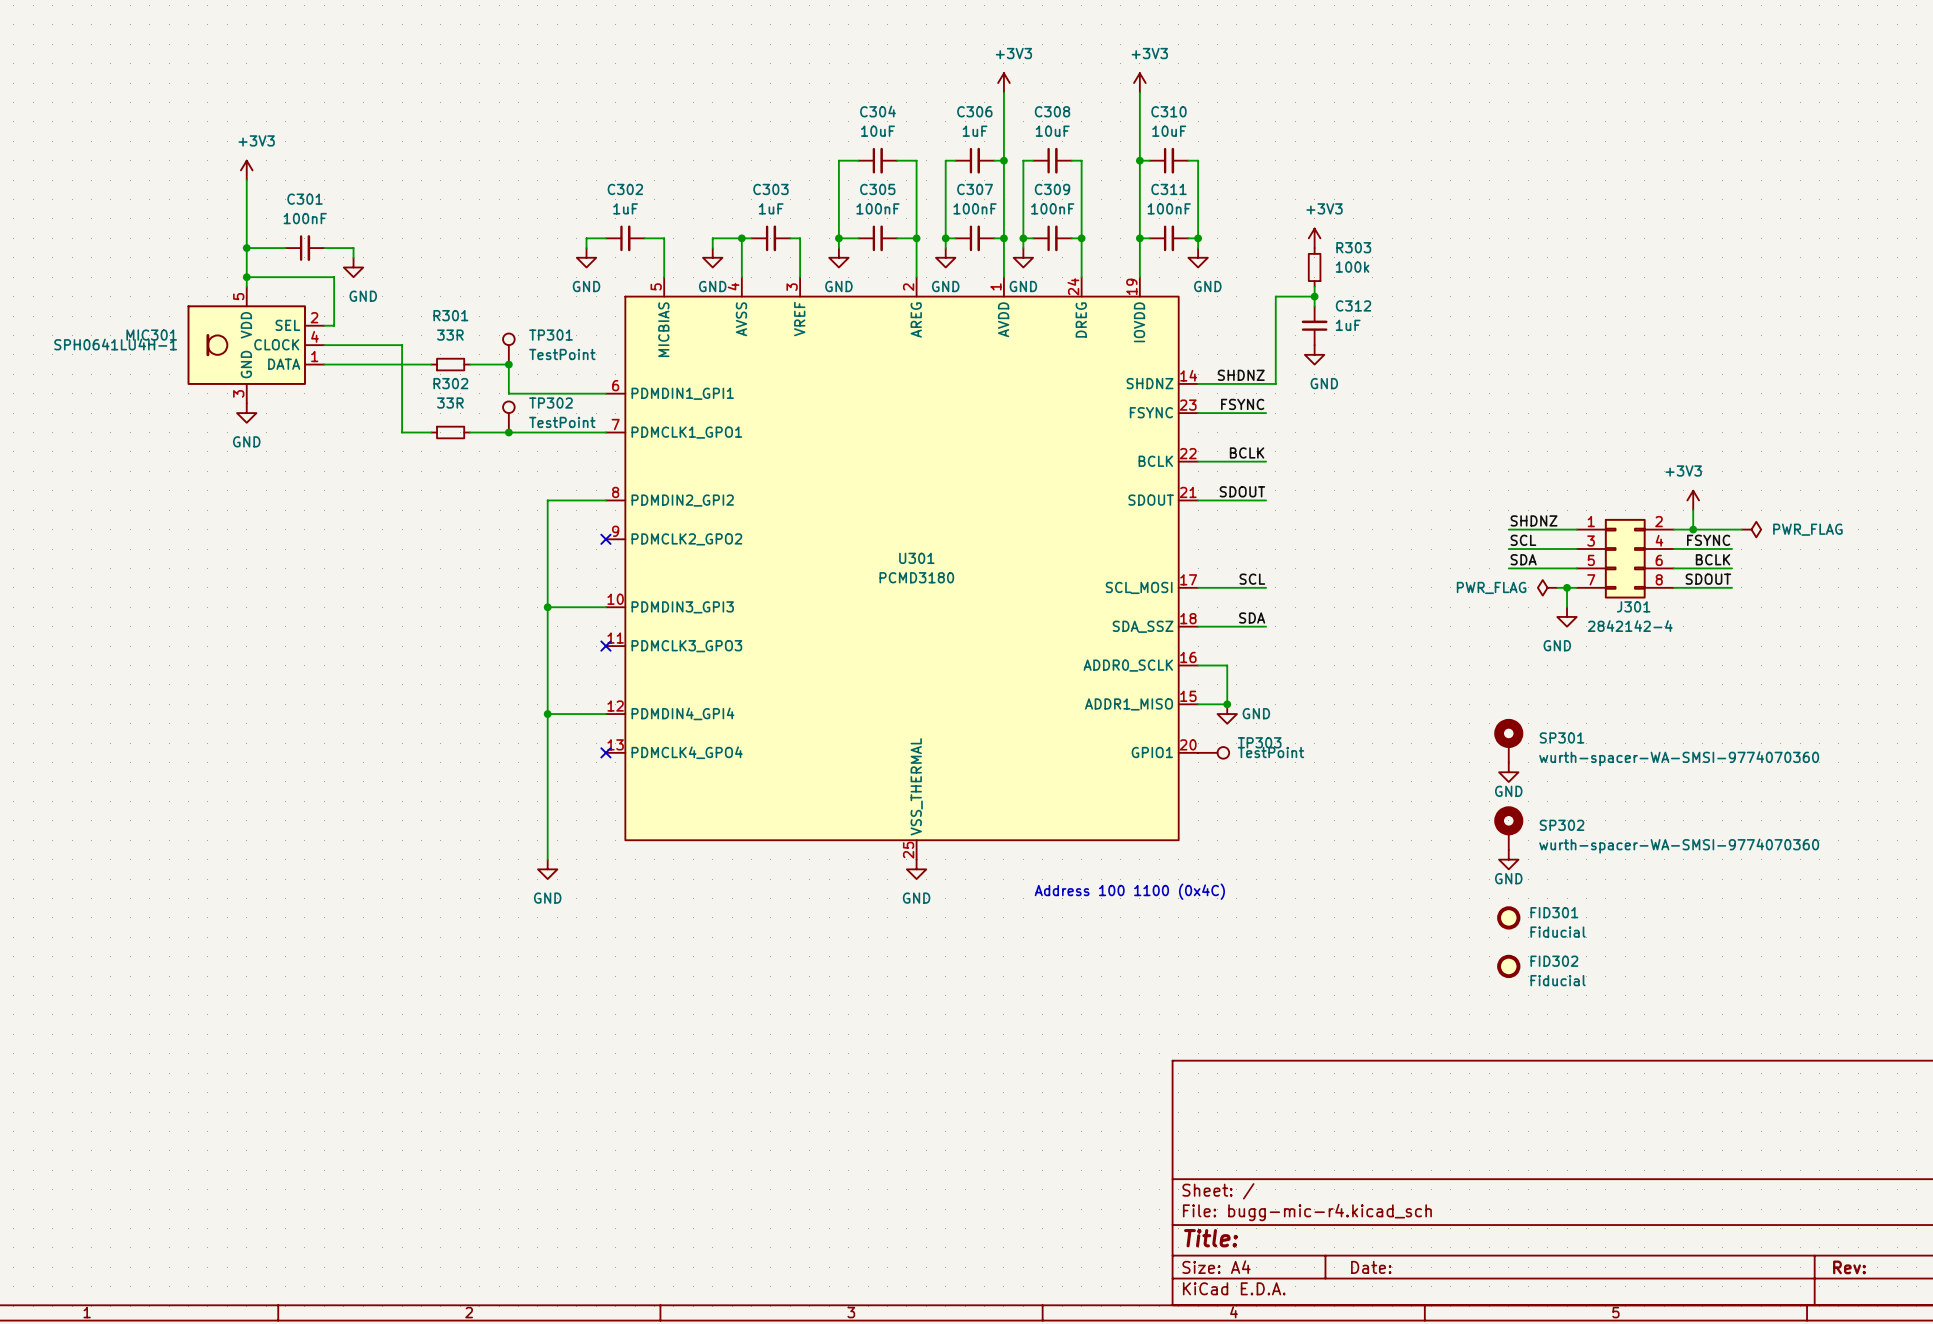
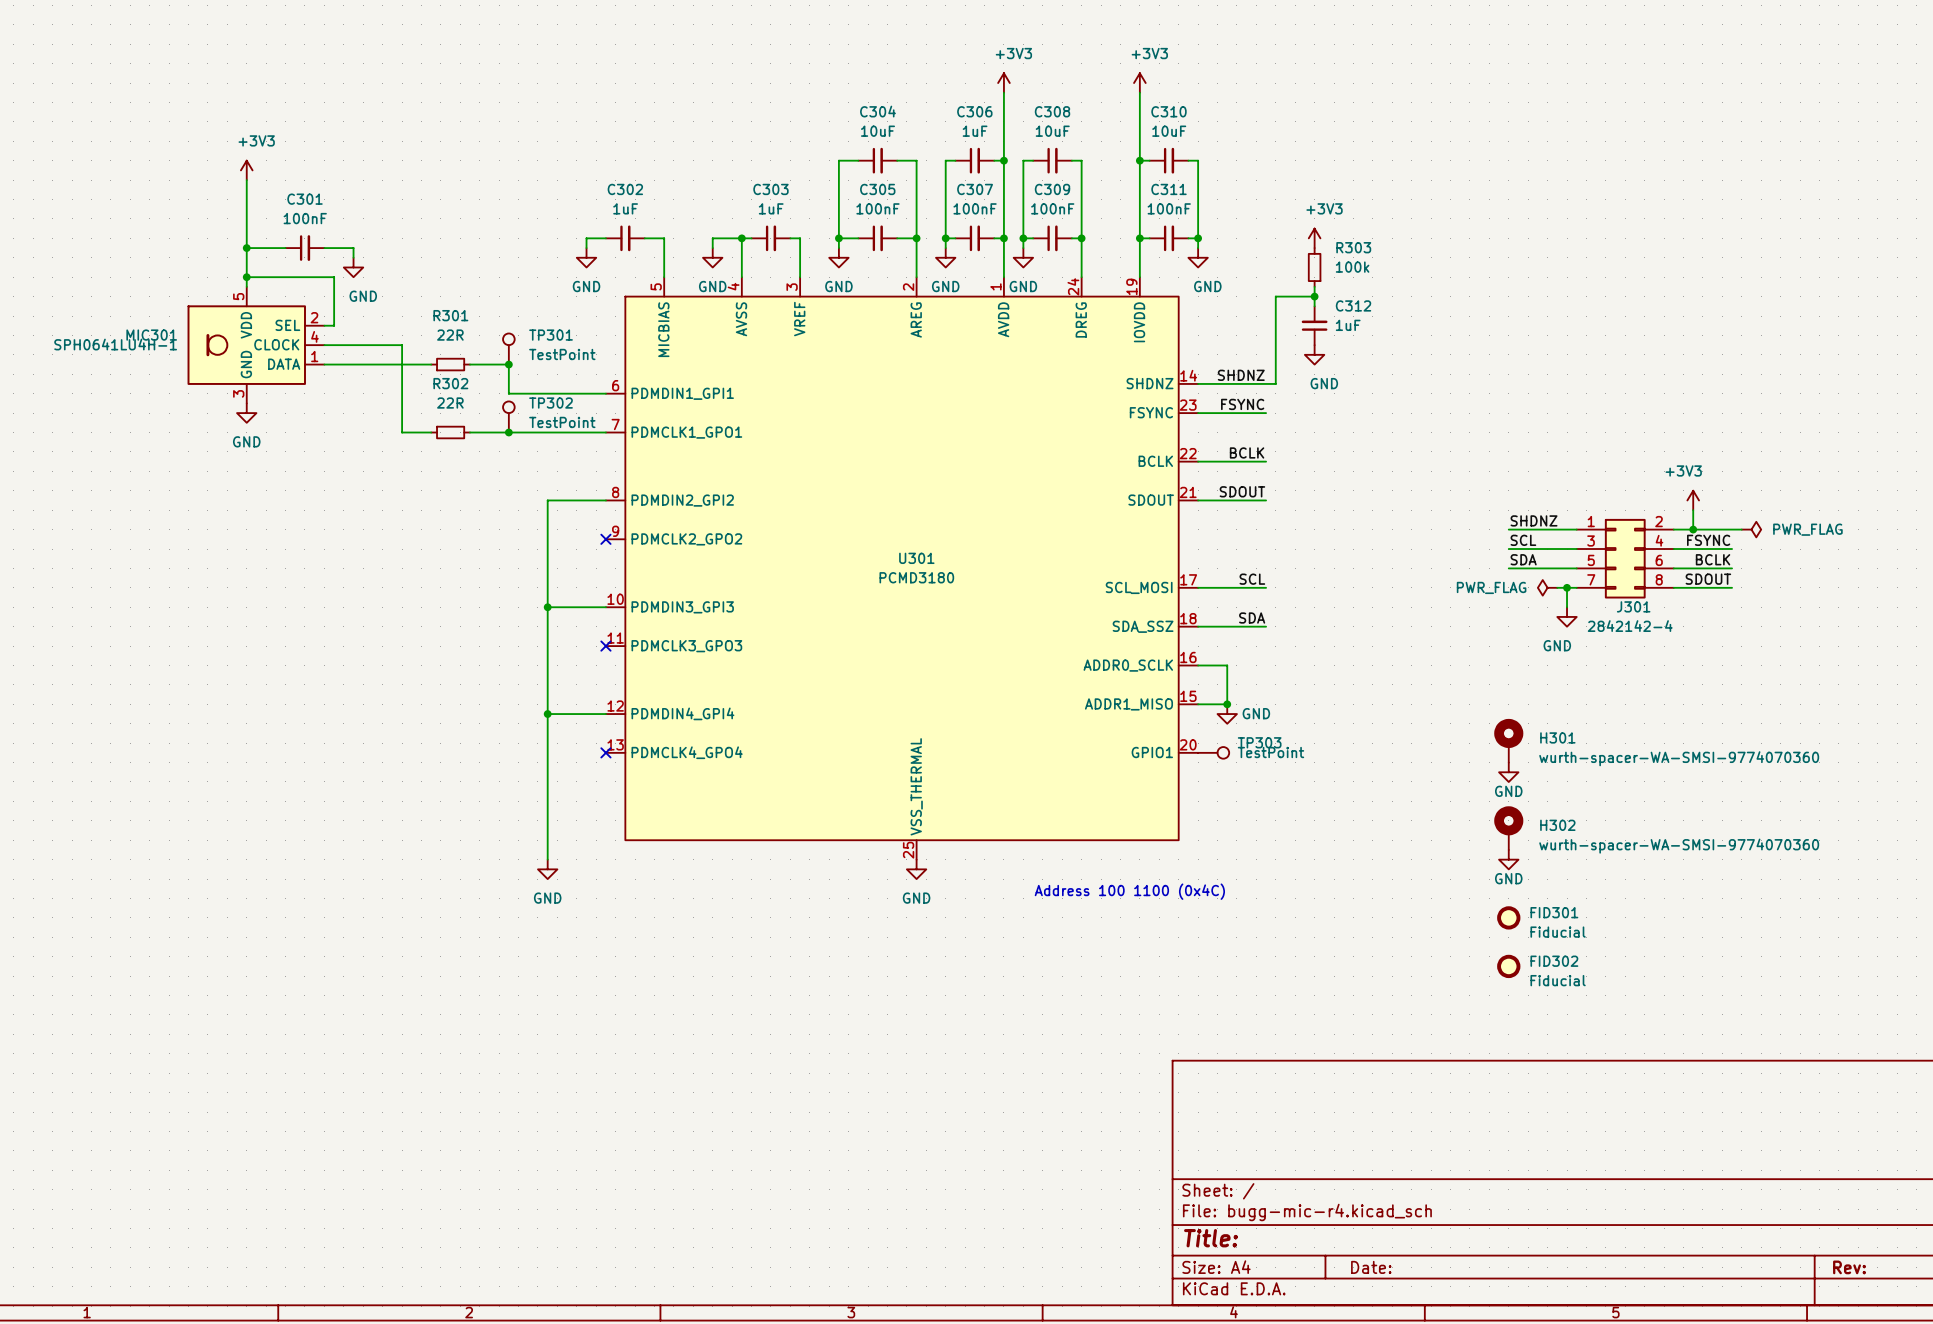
R301 value: 33R (450, 335) -> 22R (450, 335)
R302 value: 33R (450, 403) -> 22R (450, 403)
SP301 name: SP301 (1562, 737) -> H301 (1557, 737)
SP302 name: SP302 (1562, 825) -> H302 (1557, 825)

